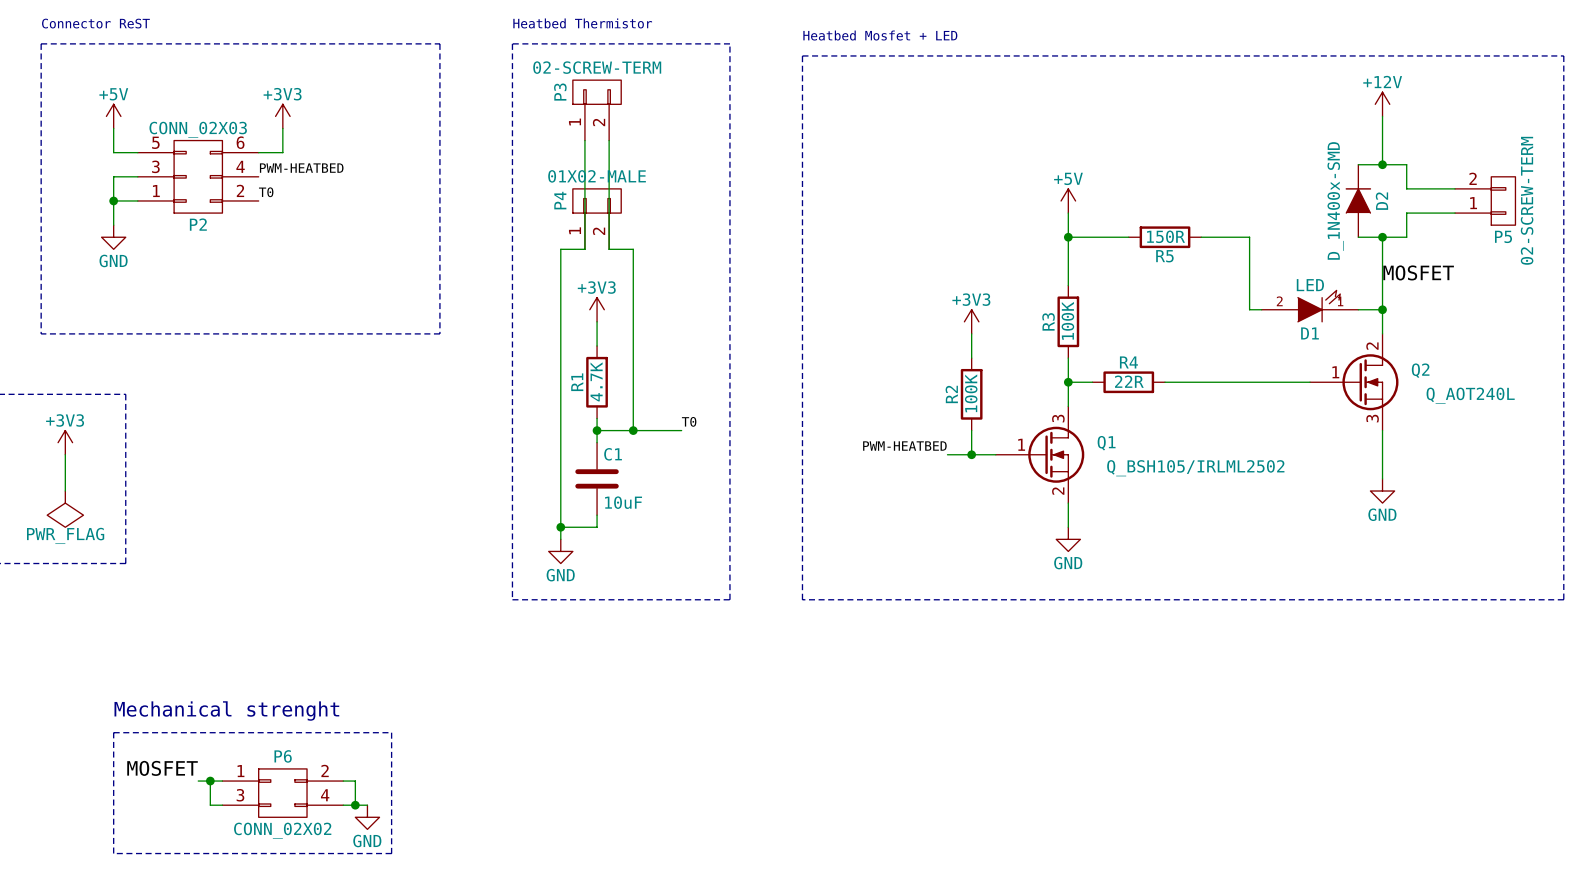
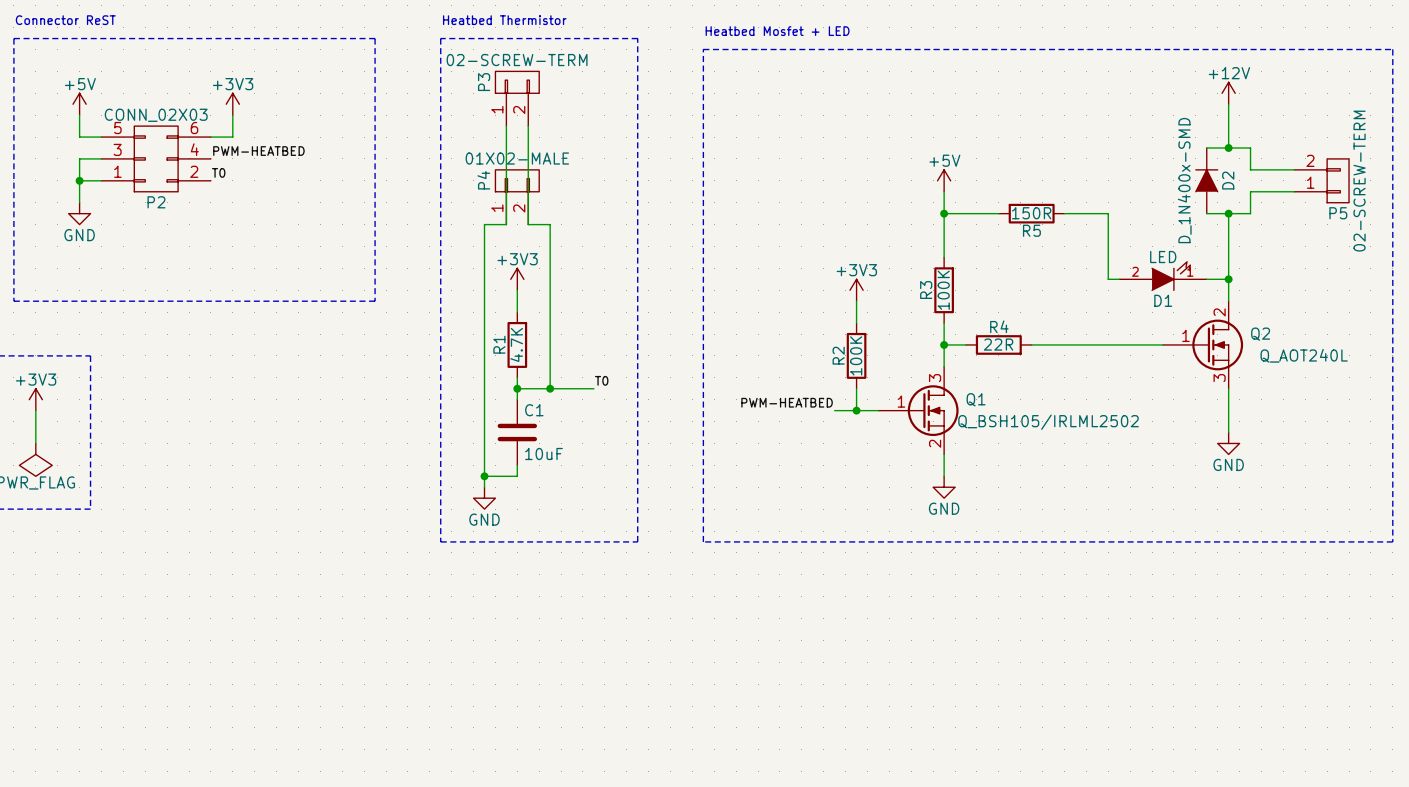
label: MOSFET (1418, 272) -> none
text: Mechanical strenght (226, 710) -> none
line: (113, 732) (391, 732) (391, 853) (113, 853) (113, 732) -> none
label: MOSFET (162, 768) -> none
wire: (198, 781) (222, 781) -> none
wire: (210, 781) (210, 805) (222, 805) -> none
junction: (210, 781) -> none
wire: (343, 781) (355, 781) (355, 805) -> none
P6: CONN_02X02 (282, 793) -> none
wire: (343, 805) (367, 805) -> none
junction: (355, 805) -> none
power symbol: GND (367, 817) -> none

